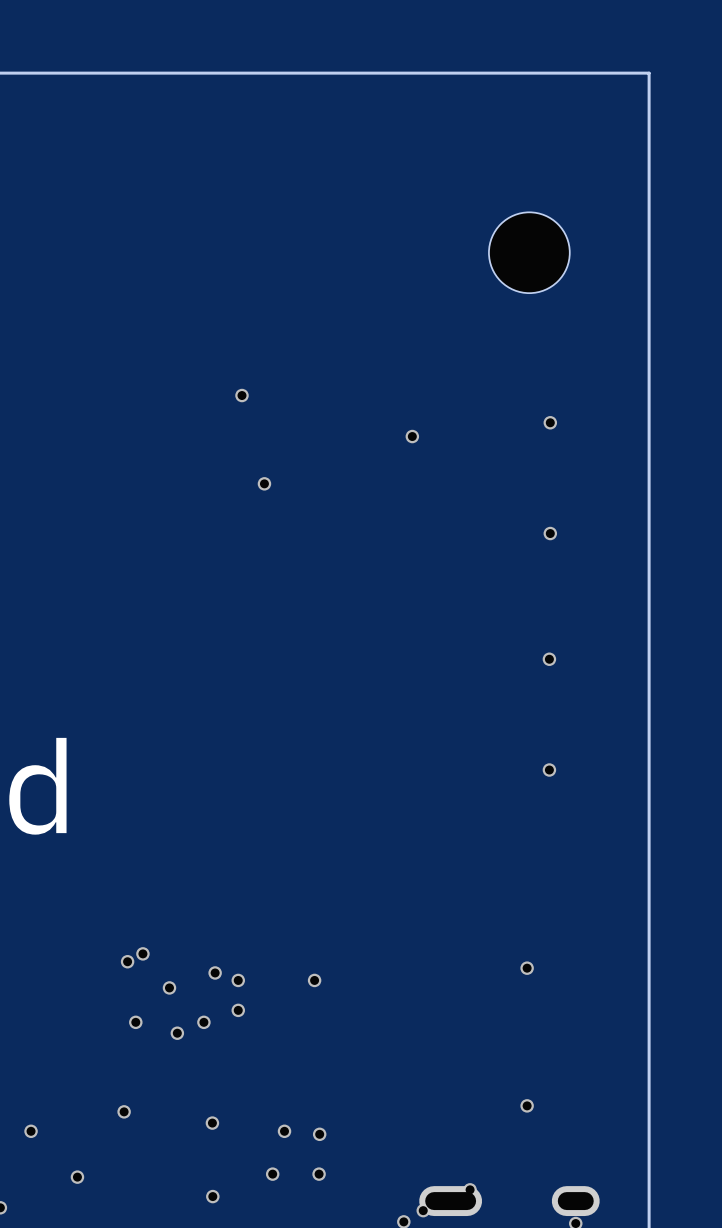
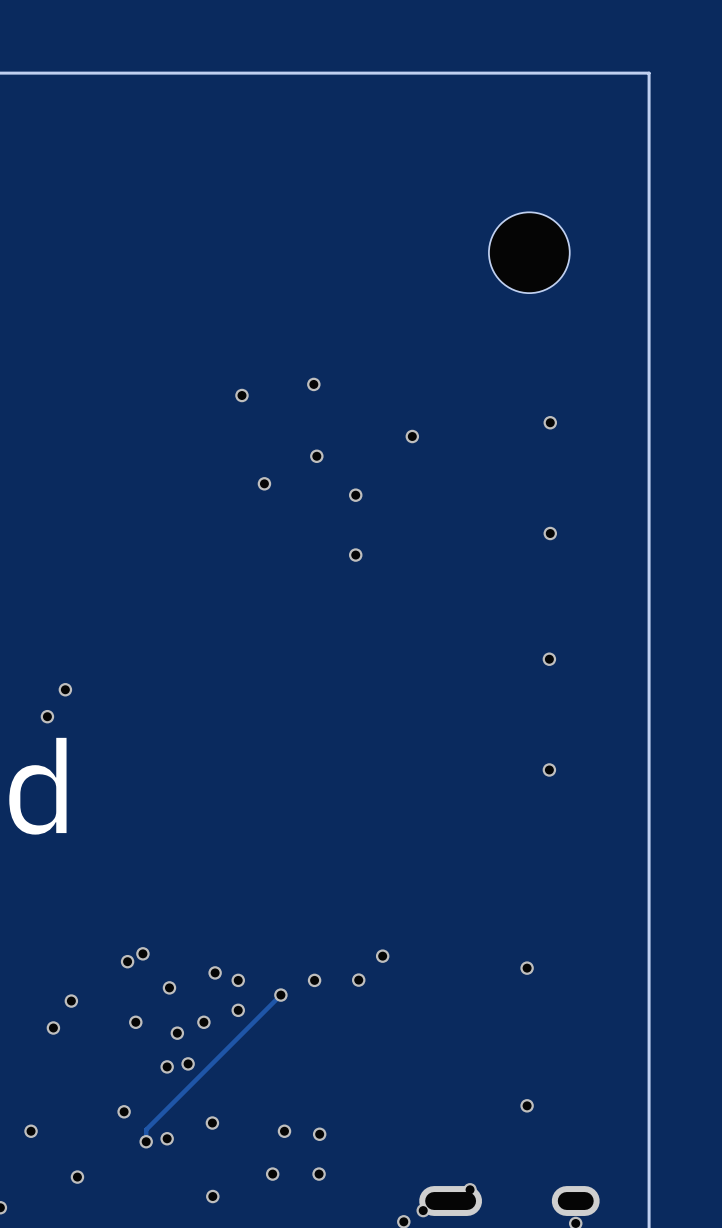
via: none -> (313, 384)
via: none -> (316, 456)
via: none -> (355, 495)
via: none -> (355, 555)
via: none -> (65, 689)
via: none -> (47, 716)
via: none -> (382, 956)
via: none -> (358, 980)
track: none -> (280, 995) (146, 1129) (146, 1141)
via: none -> (280, 995)
via: none -> (71, 1001)
via: none -> (53, 1027)
via: none -> (188, 1063)
via: none -> (167, 1066)
via: none -> (167, 1138)
via: none -> (146, 1141)

